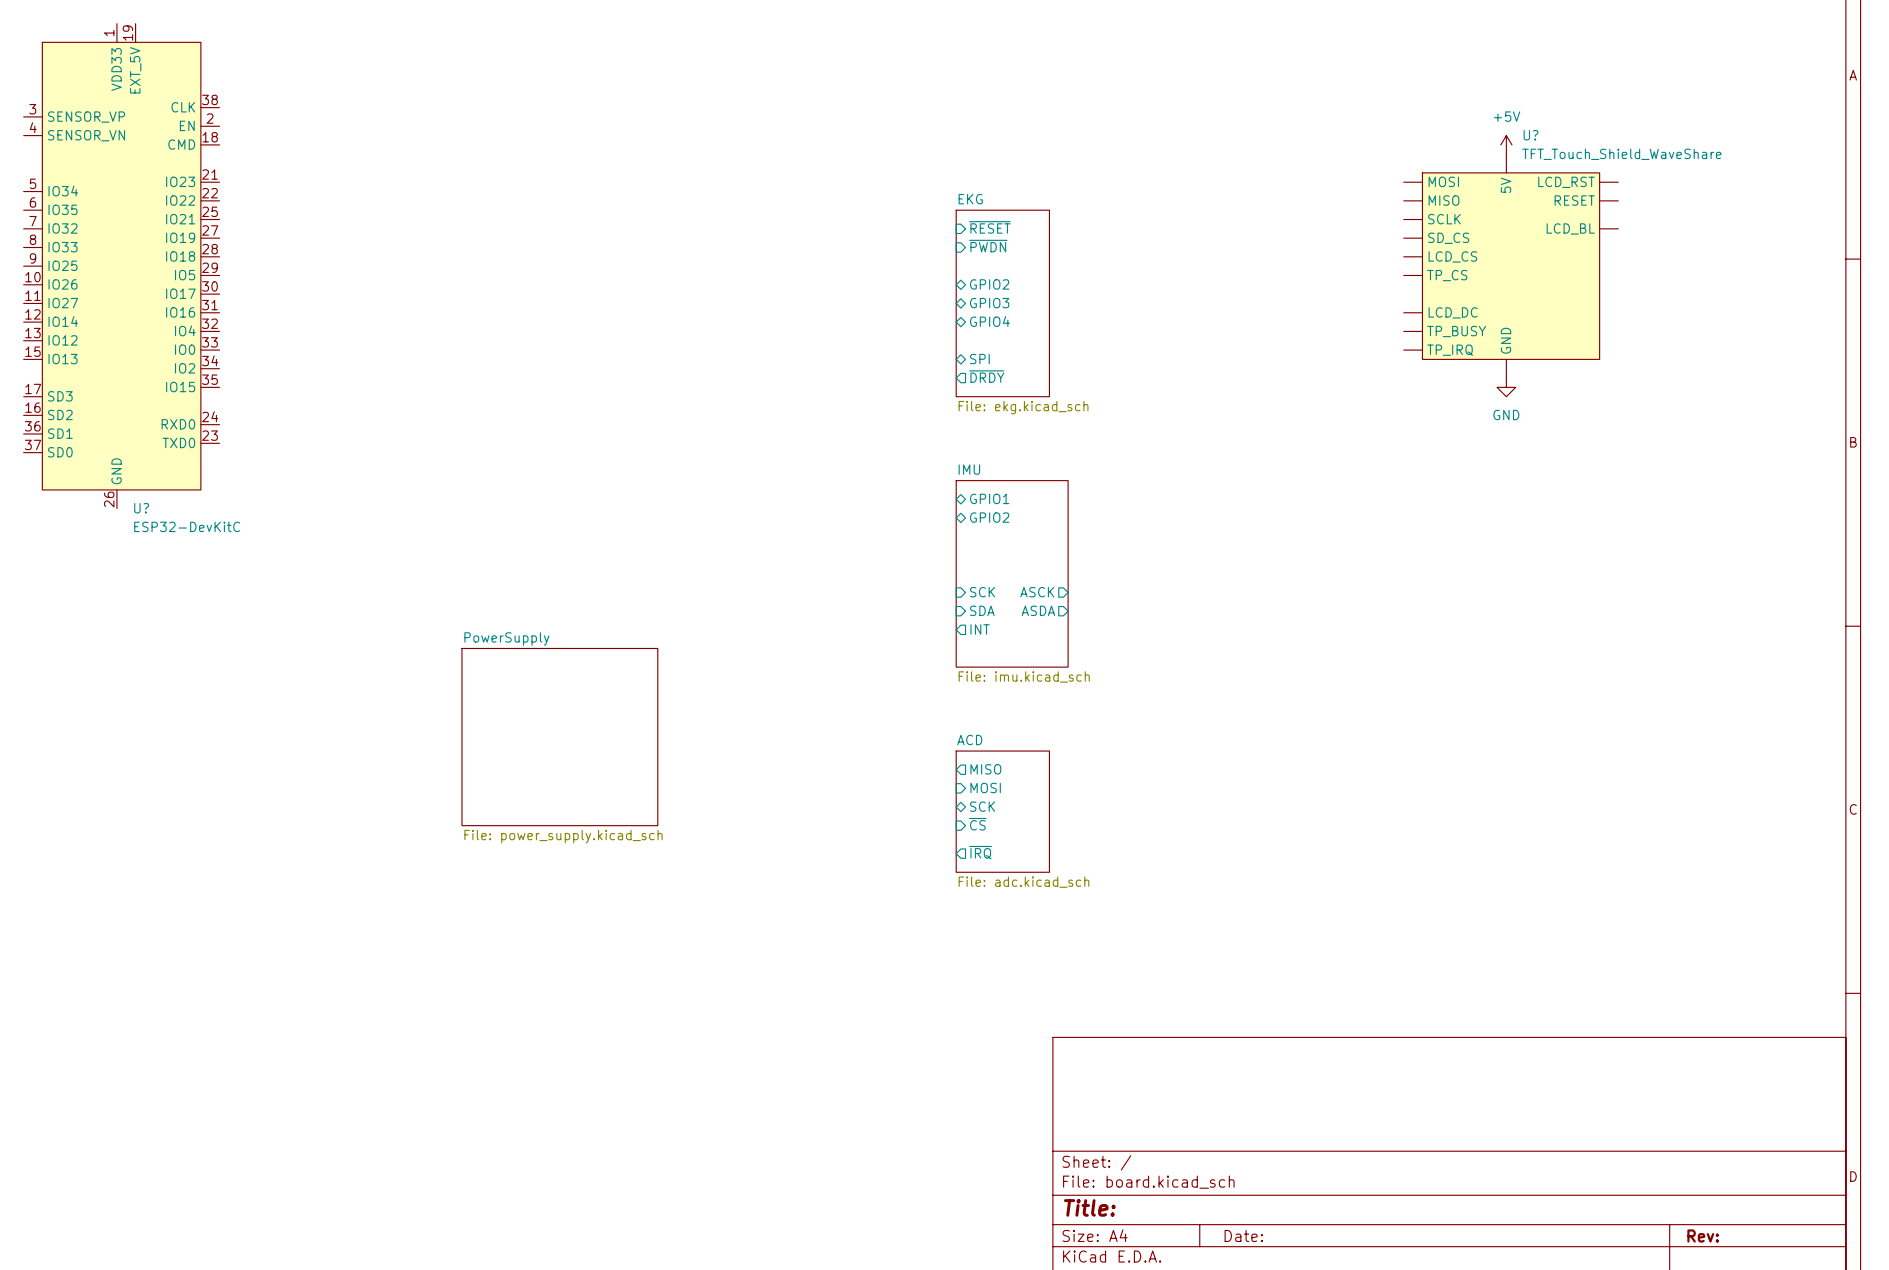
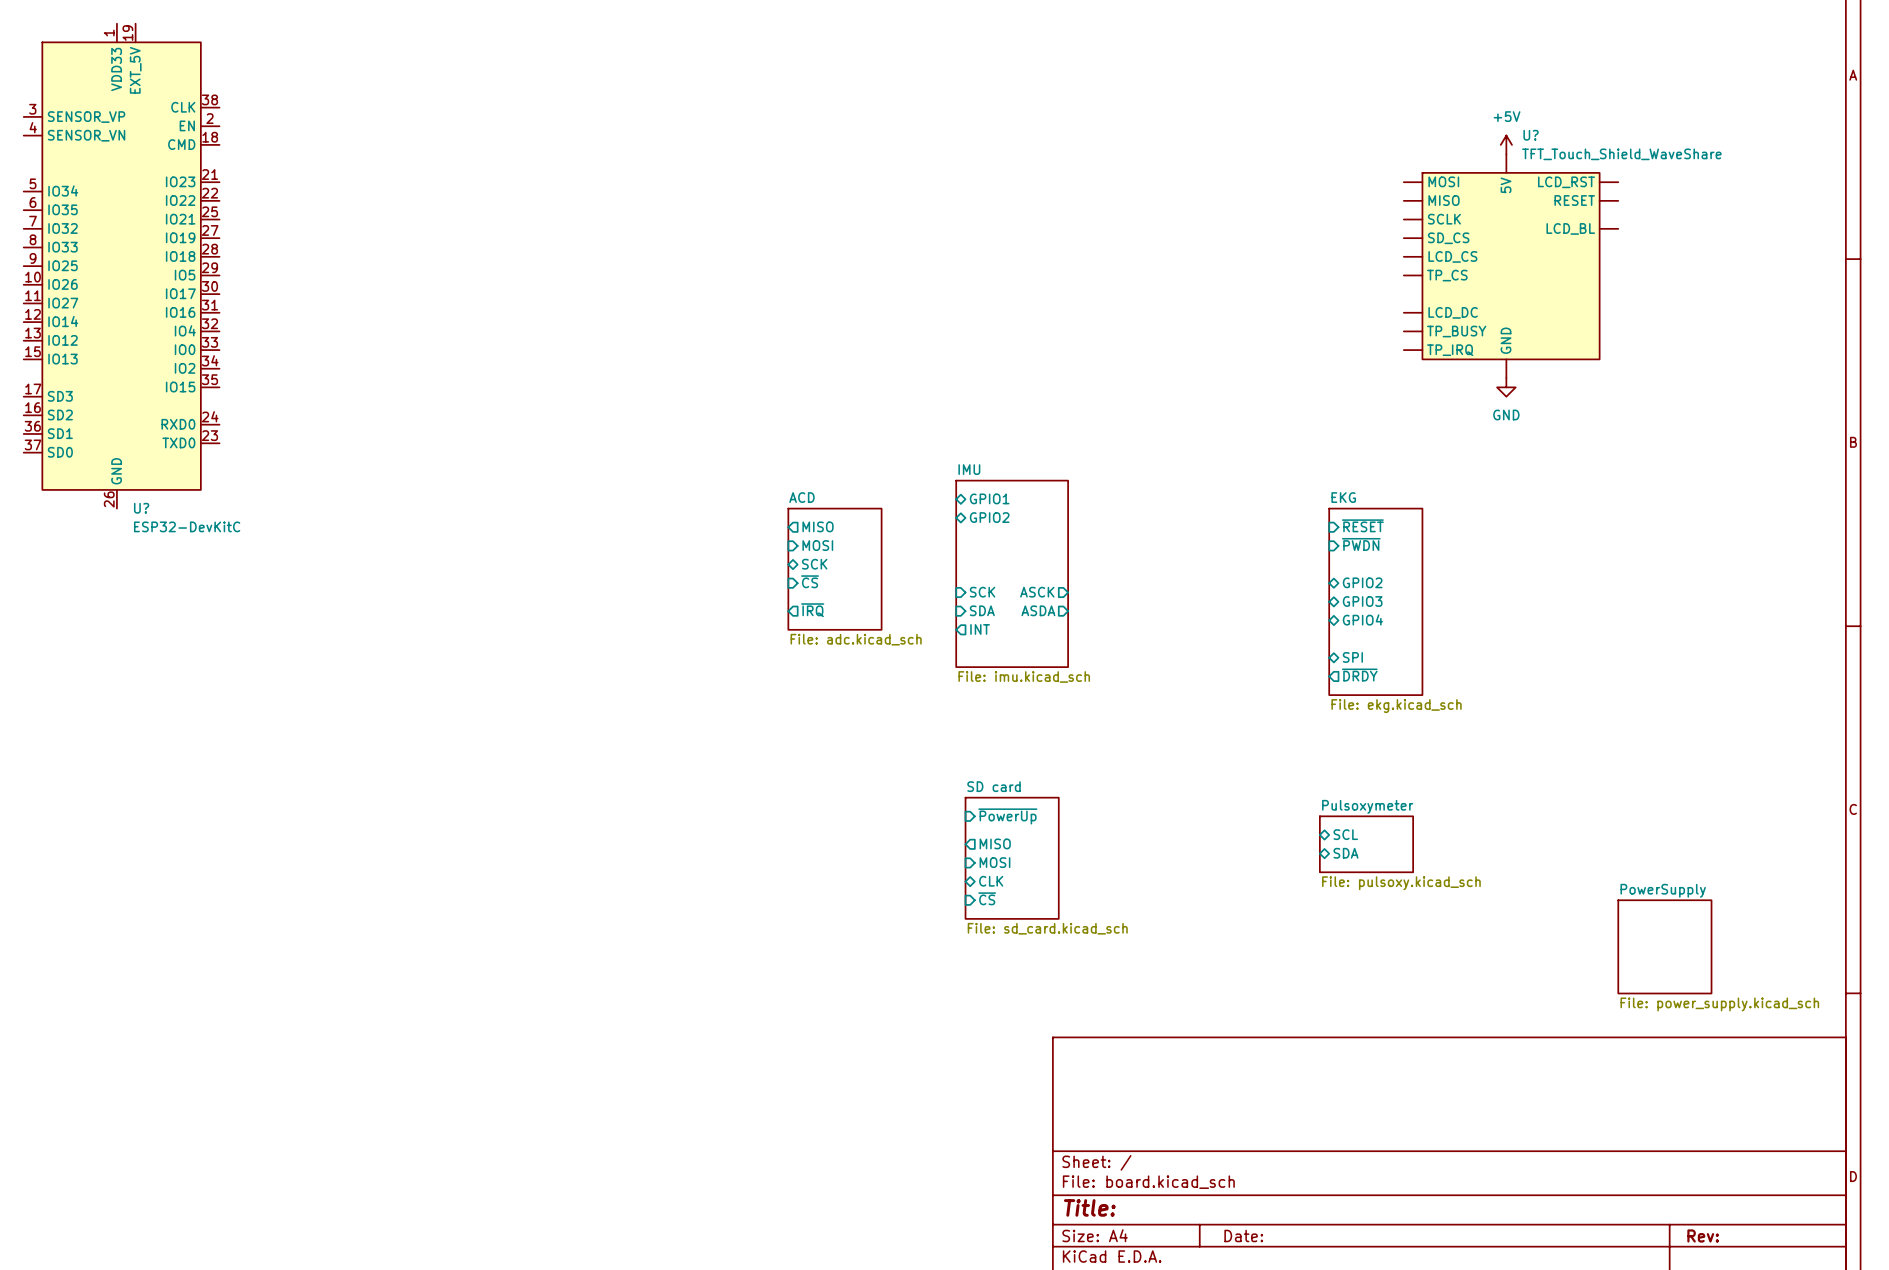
sheet pin: ~{RESET} (989, 227) -> none
sheet pin: ~{PWDN} (988, 246) -> none
sheet pin: GPIO2 (989, 284) -> none
sheet pin: GPIO3 (989, 303) -> none
sheet EKG: File: ekg.kicad_sch (1002, 303) -> none
sheet pin: GPIO4 (989, 321) -> none
sheet pin: SPI (979, 359) -> none
sheet pin: ~{DRDY} (986, 376) -> none
sheet pin: none -> ~{RESET} (1362, 525)
sheet pin: none -> MISO (818, 526)
sheet pin: none -> ~{PWDN} (1361, 544)
sheet pin: none -> MOSI (817, 545)
sheet pin: none -> SCK (814, 564)
sheet ACD: none -> File: adc.kicad_sch (834, 569)
sheet pin: none -> ~{CS} (810, 581)
sheet pin: none -> GPIO2 (1362, 582)
sheet pin: none -> GPIO3 (1362, 601)
sheet EKG: none -> File: ekg.kicad_sch (1375, 601)
sheet pin: none -> ~{IRQ} (812, 610)
sheet pin: none -> GPIO4 (1362, 619)
sheet pin: none -> SPI (1352, 657)
sheet pin: none -> ~{DRDY} (1359, 675)
sheet PowerSupply: File: power_supply.kicad_sch (559, 737) -> none
sheet pin position: MISO (985, 769) -> MISO (995, 843)
sheet pin position: MOSI (985, 788) -> MOSI (994, 862)
sheet pin: SCK (982, 806) -> none
sheet ACD: File: adc.kicad_sch (1002, 811) -> none
sheet pin: none -> ~{PowerUp} (1007, 816)
sheet pin position: ~{CS} (977, 824) -> ~{CS} (987, 898)
sheet pin: none -> SCL (1345, 834)
sheet Pulsoxymeter: none -> File: pulsoxy.kicad_sch (1366, 844)
sheet pin: ~{IRQ} (980, 852) -> none
sheet pin: none -> SDA (1345, 853)
sheet SD card: none -> File: sd_card.kicad_sch (1012, 858)
sheet pin: none -> CLK (991, 881)
sheet PowerSupply: none -> File: power_supply.kicad_sch (1664, 946)

